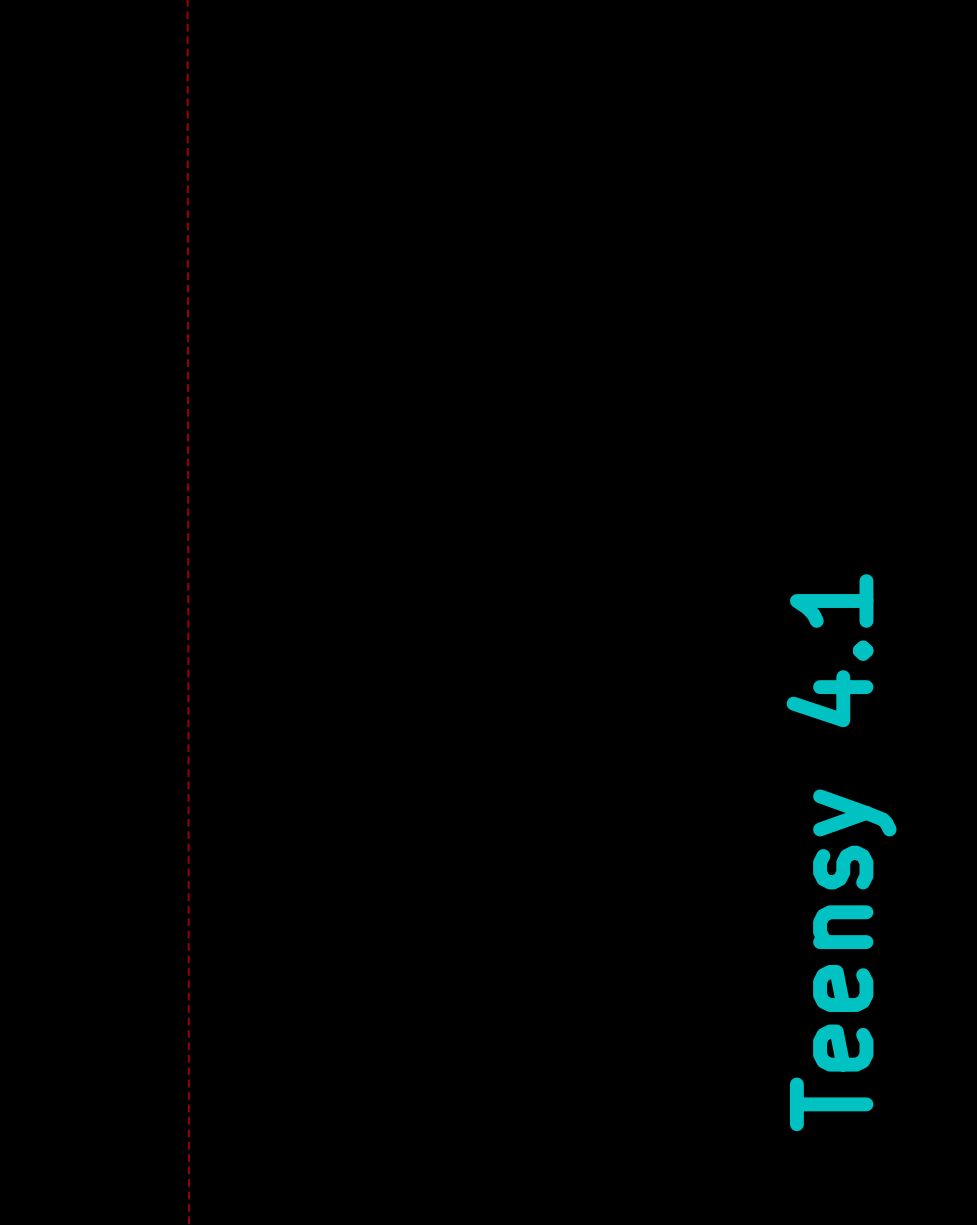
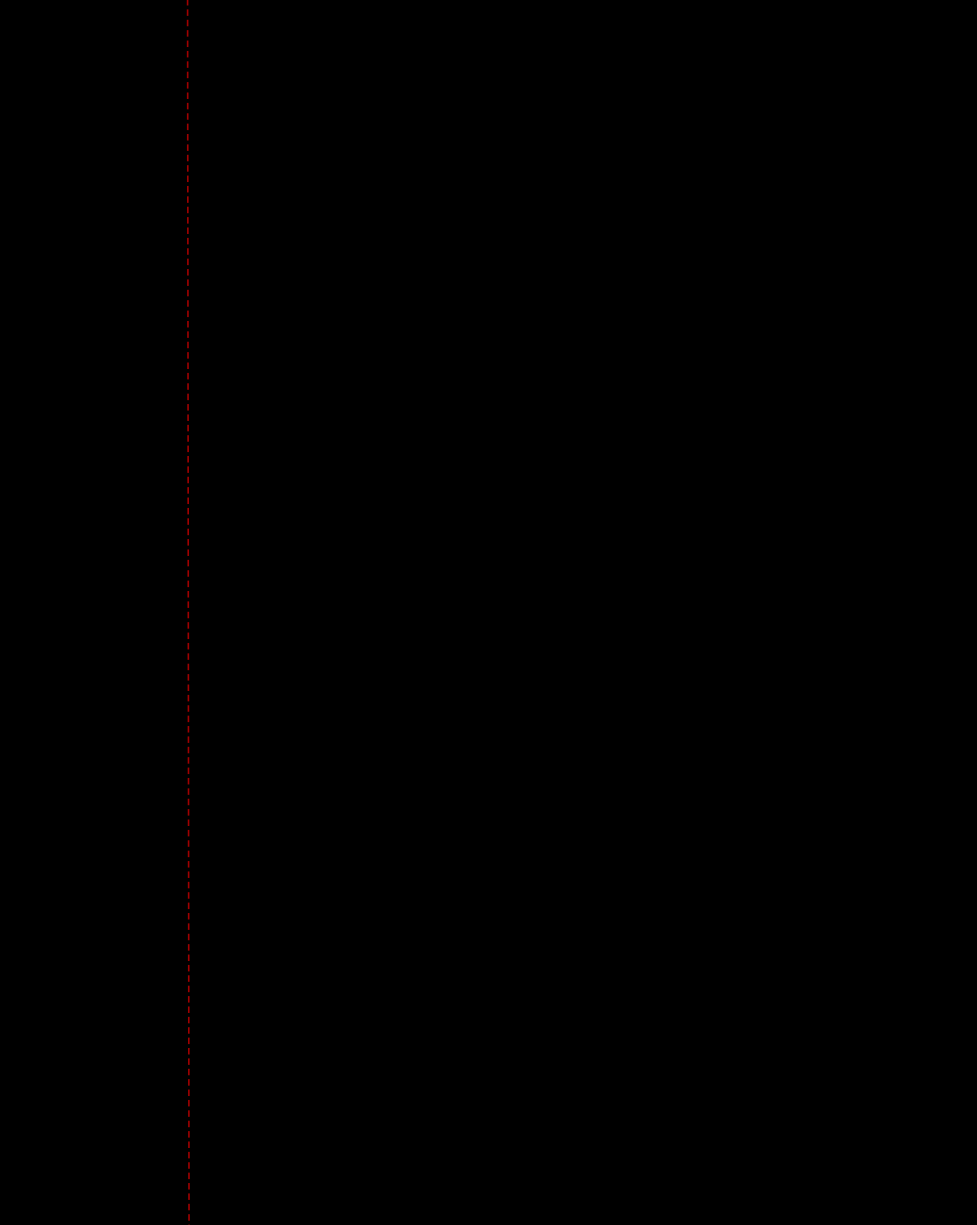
text: Teensy 4.1 (841, 852) -> none

